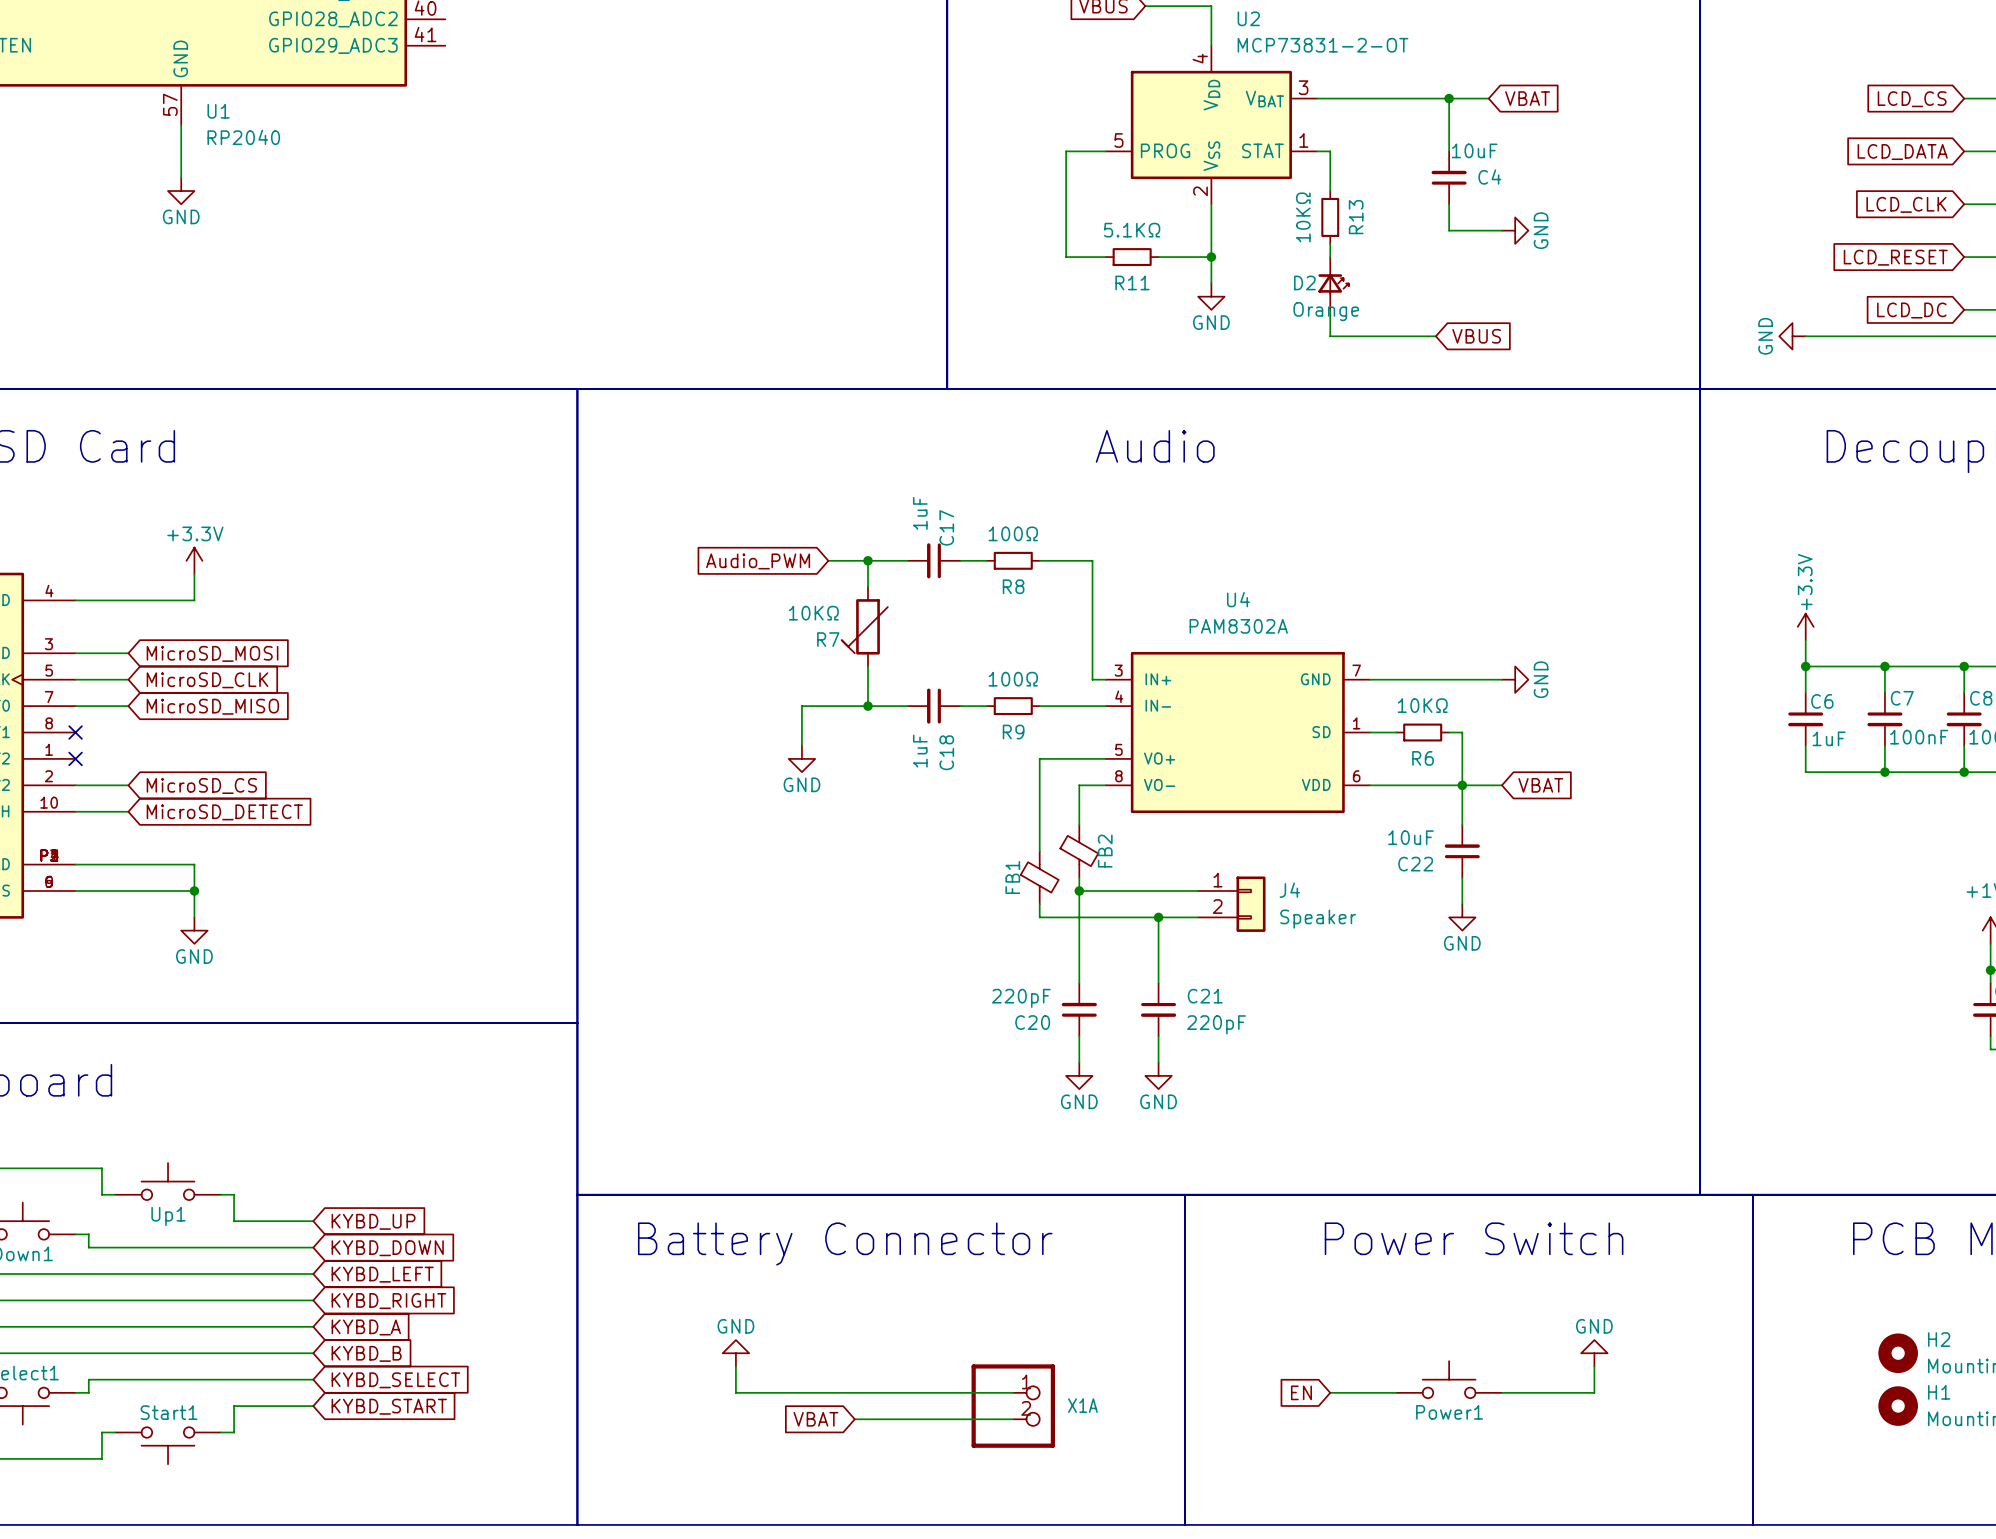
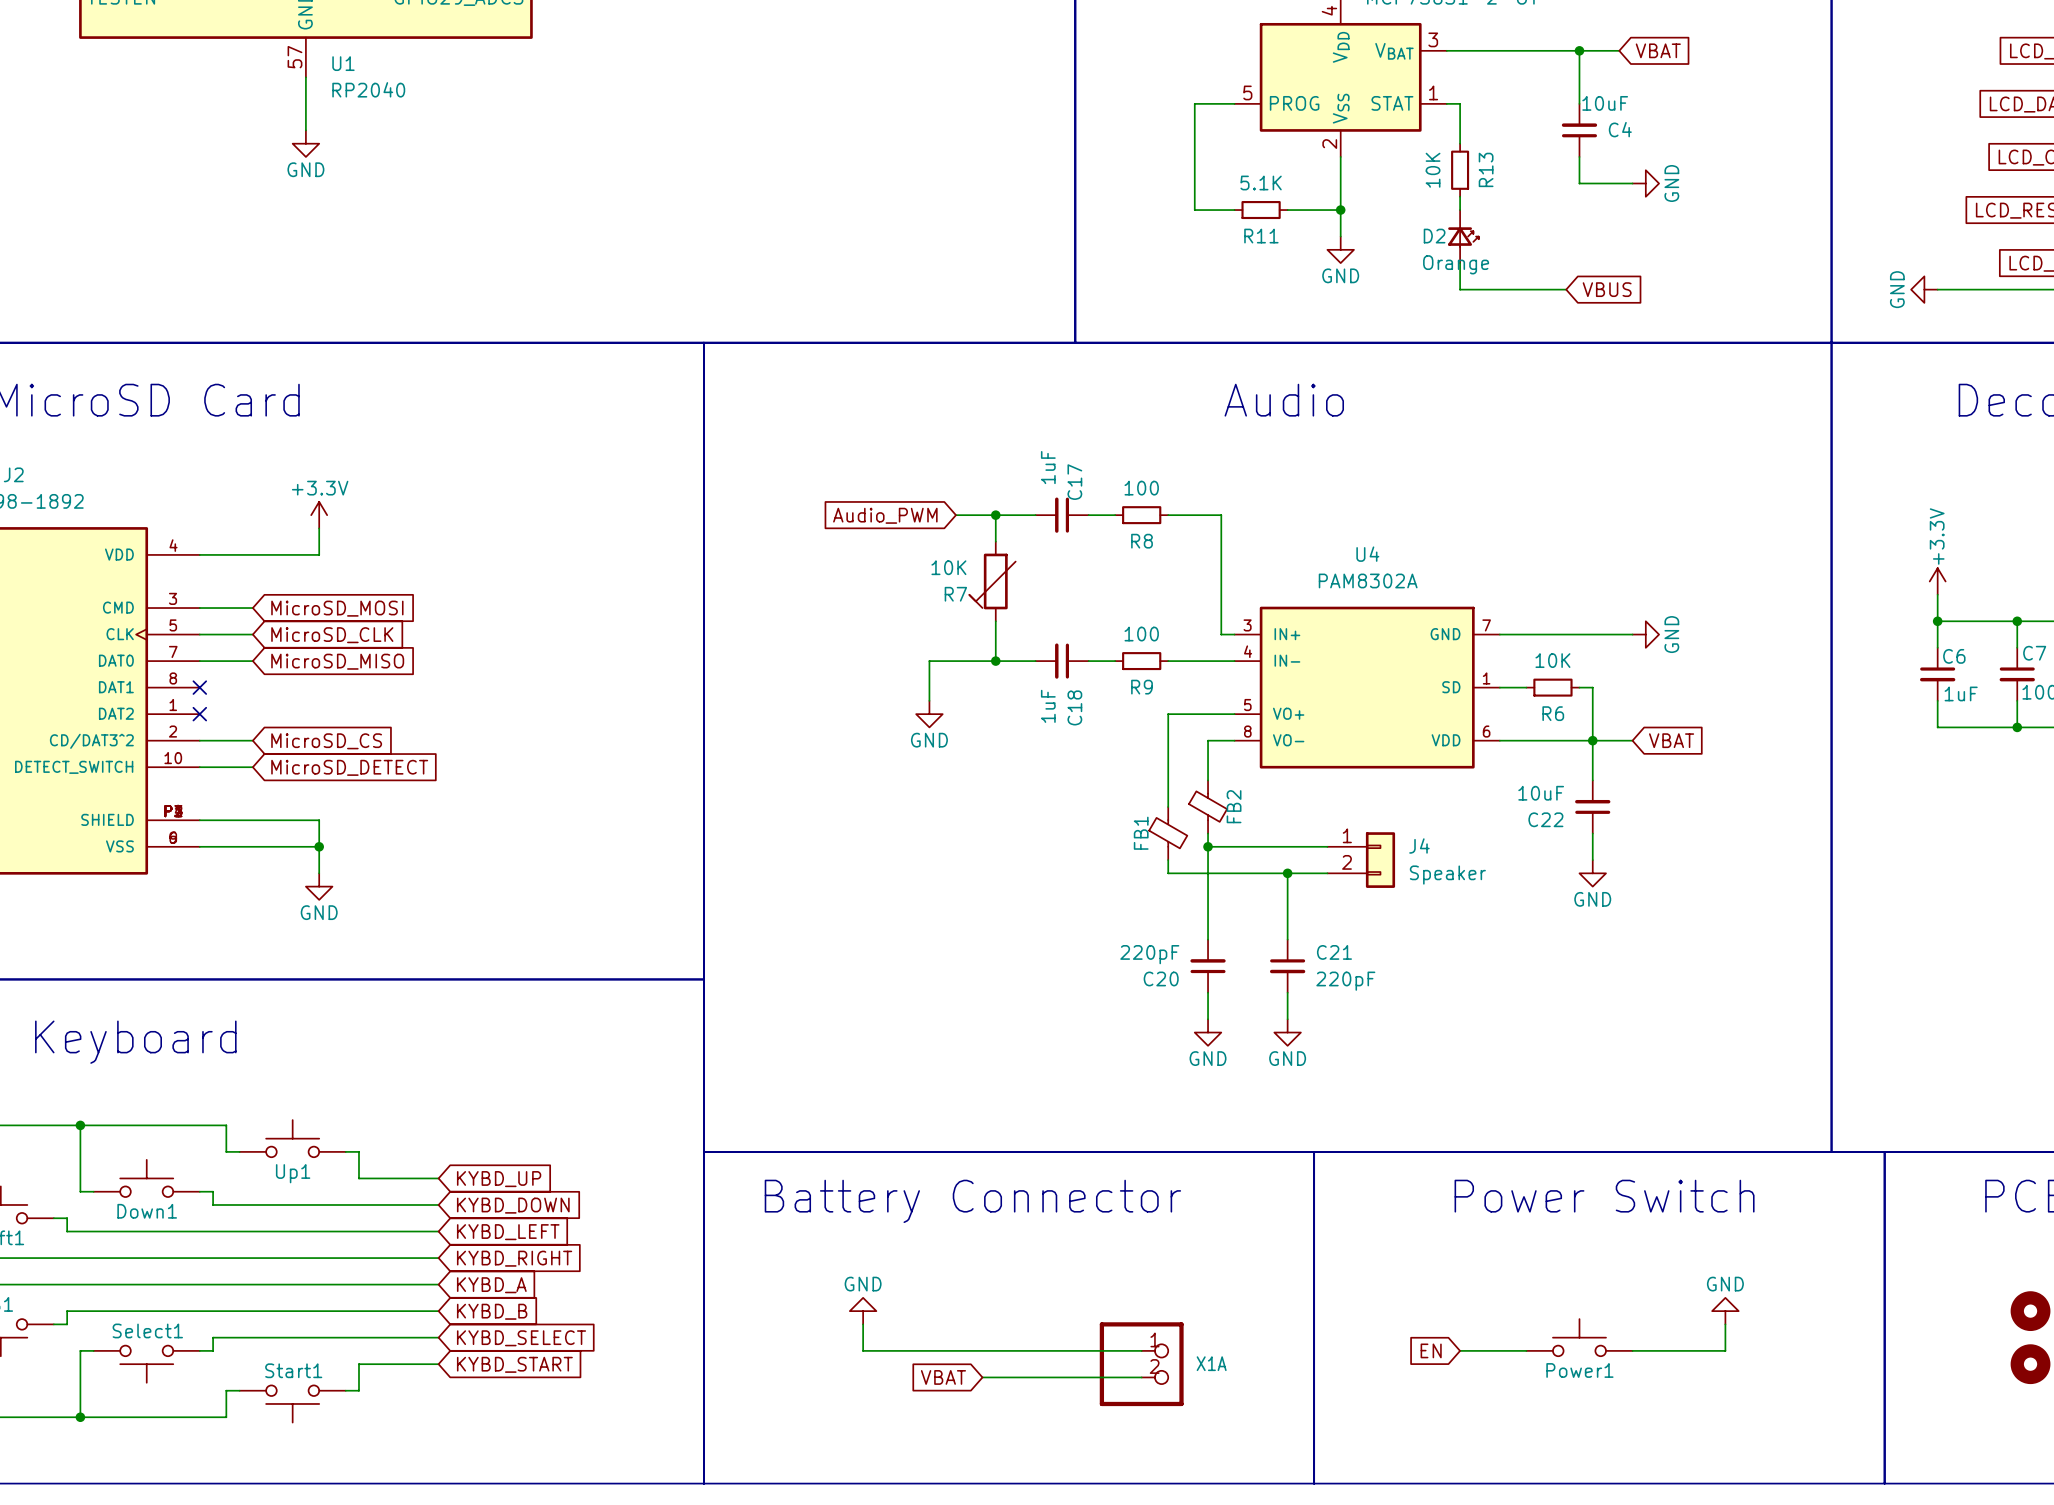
R13 value: 10KΩ (1303, 217) -> 10K (1433, 170)
R11 value: 5.1KΩ (1132, 230) -> 5.1K (1261, 183)
R8 value: 100Ω (1013, 533) -> 100 (1141, 488)
R7 value: 10KΩ (813, 613) -> 10K (948, 567)
R9 value: 100Ω (1013, 679) -> 100 (1141, 634)
R6 value: 10KΩ (1422, 705) -> 10K (1552, 660)

